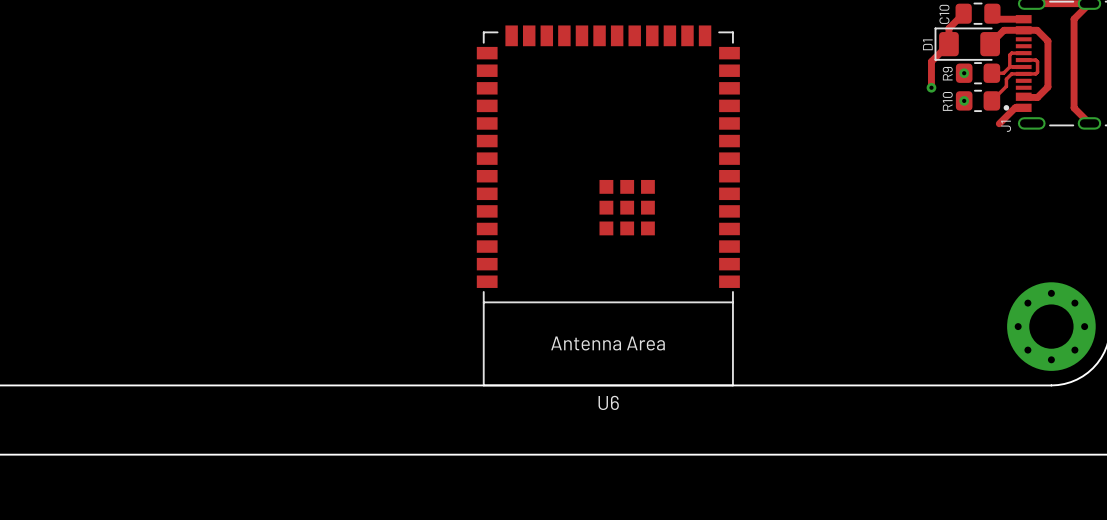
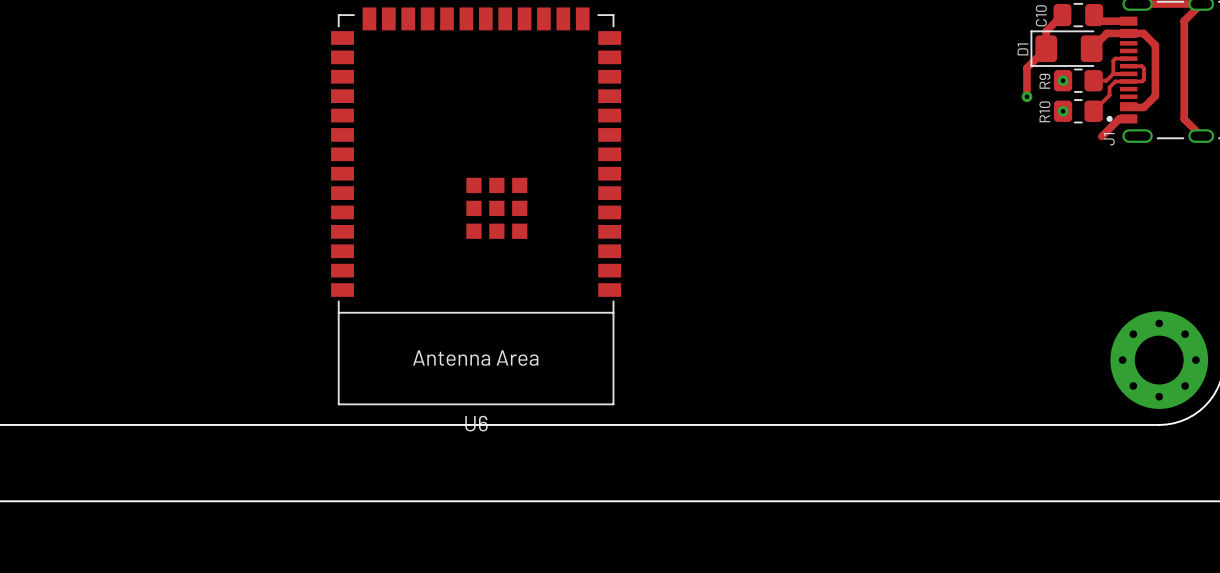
U6 position: (608, 205) -> (476, 206)

